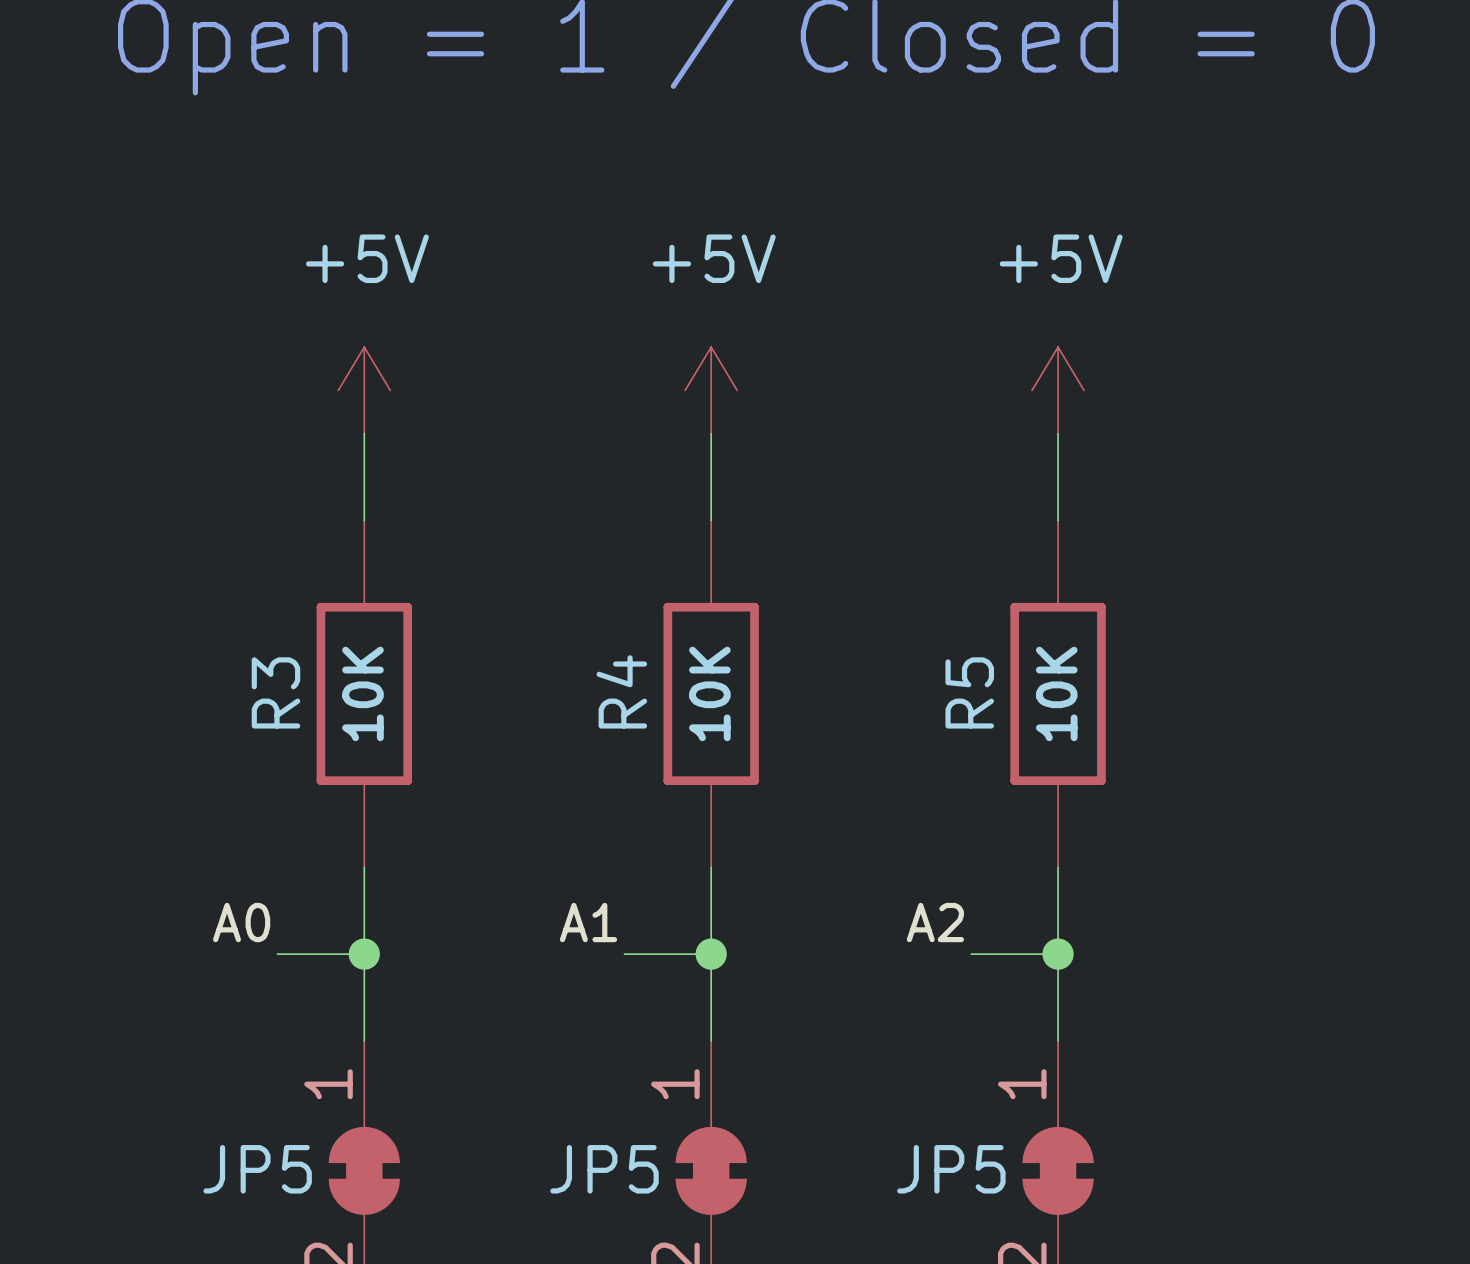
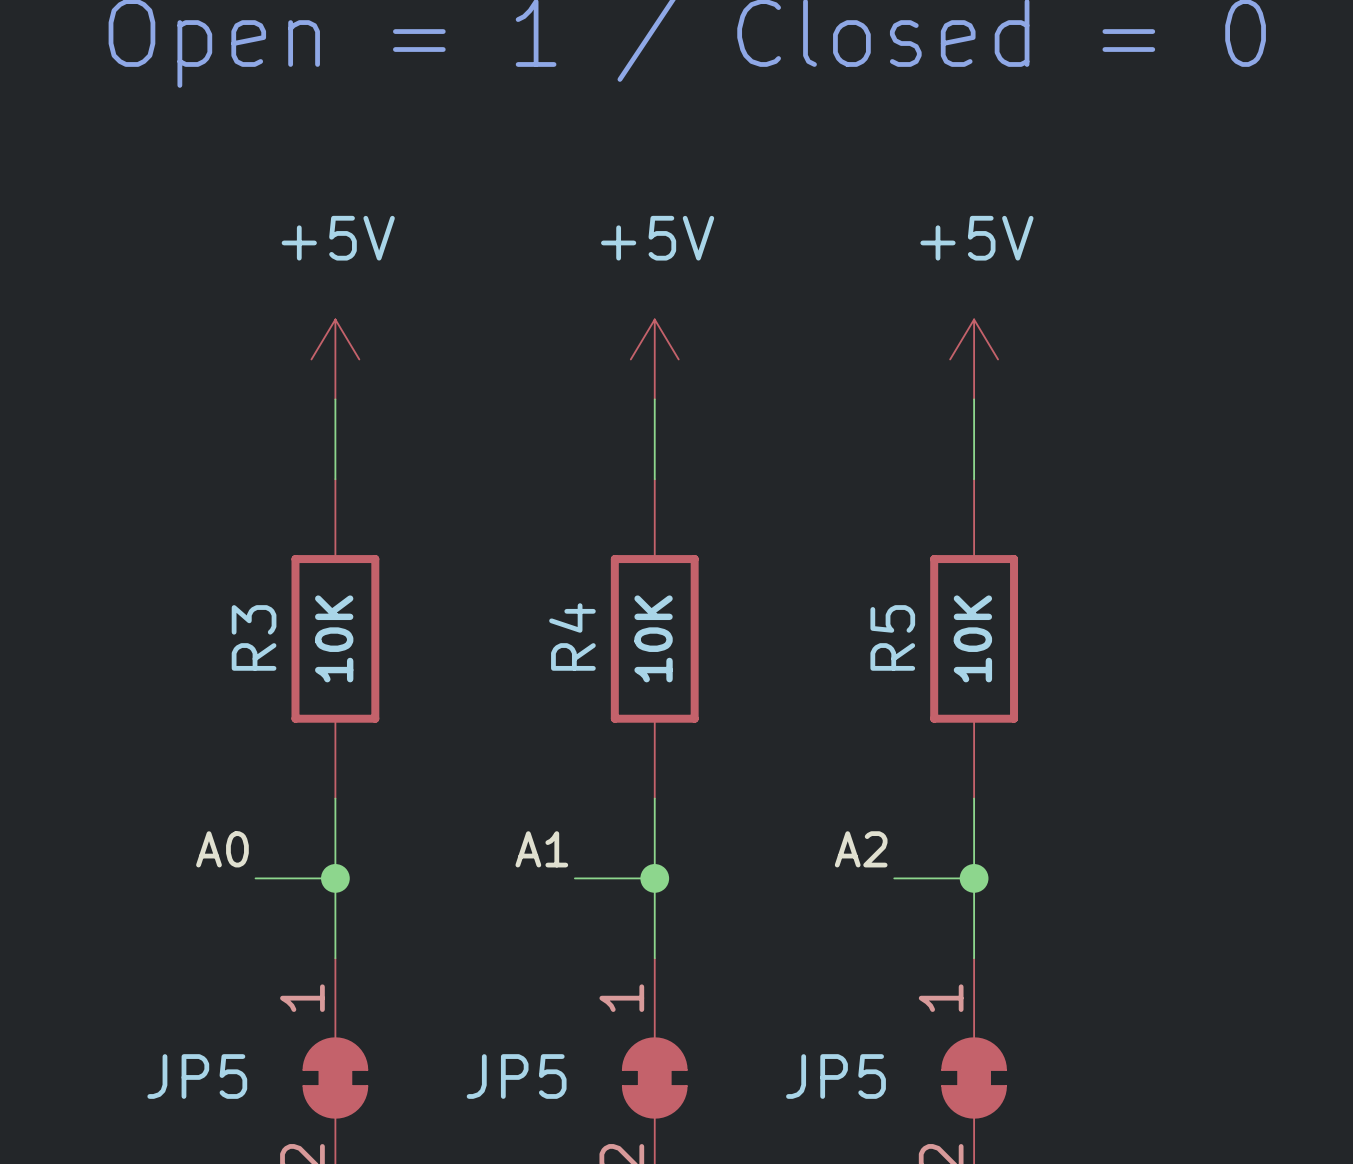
JP5 name position: JP5 (257, 1169) -> JP5 (197, 1076)
JP5 name position: JP5 (604, 1169) -> JP5 (516, 1076)
JP5 name position: JP5 (951, 1169) -> JP5 (835, 1076)

